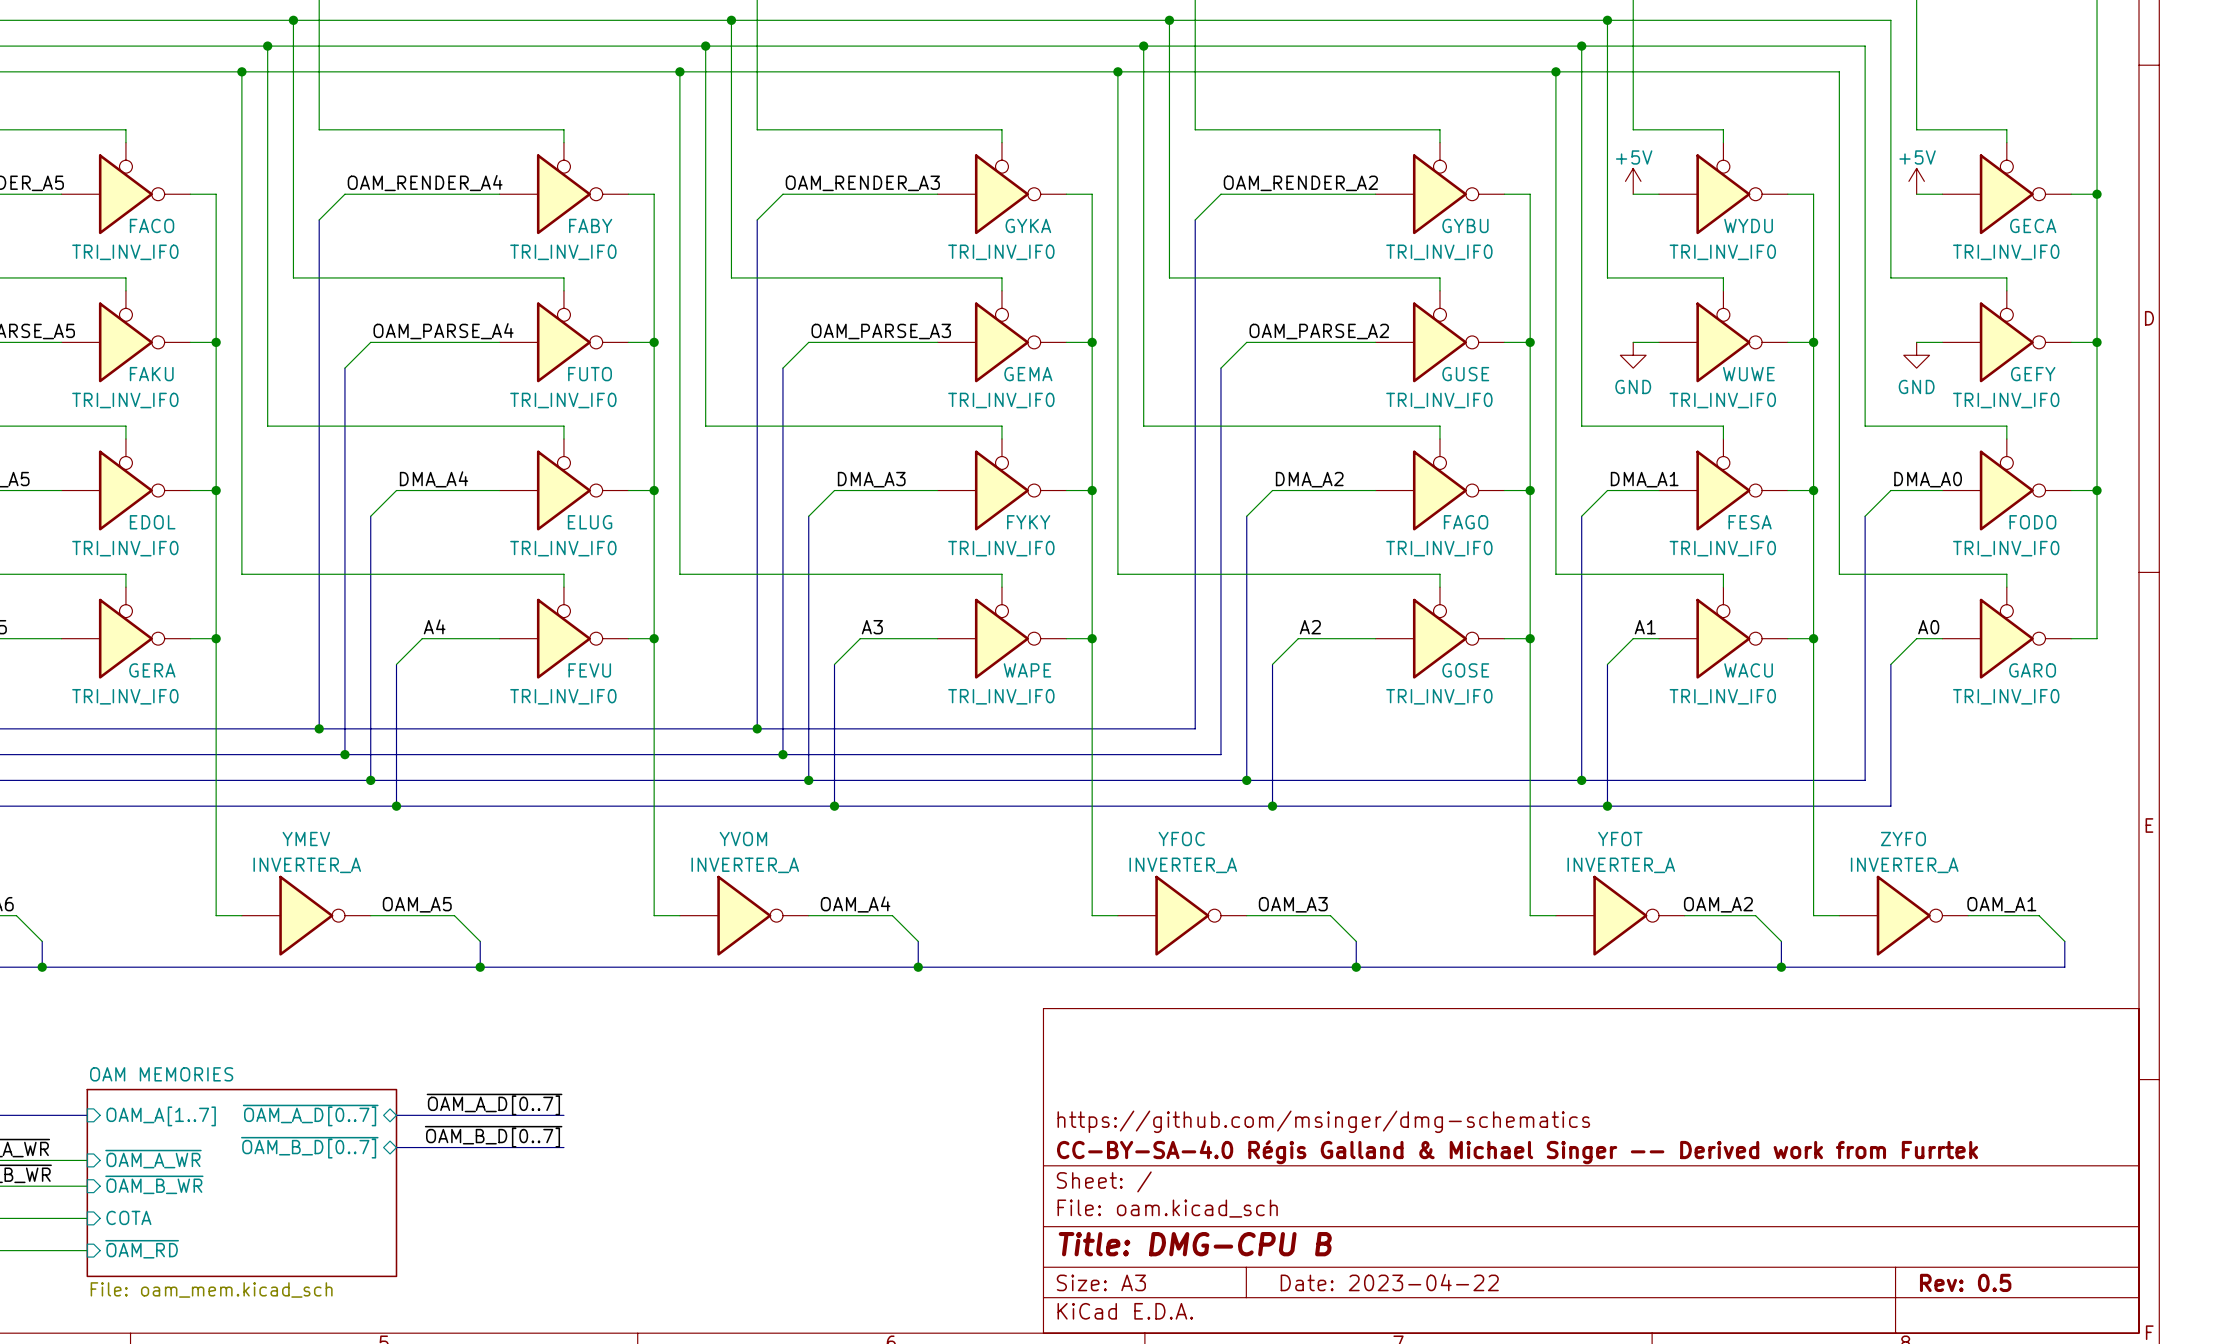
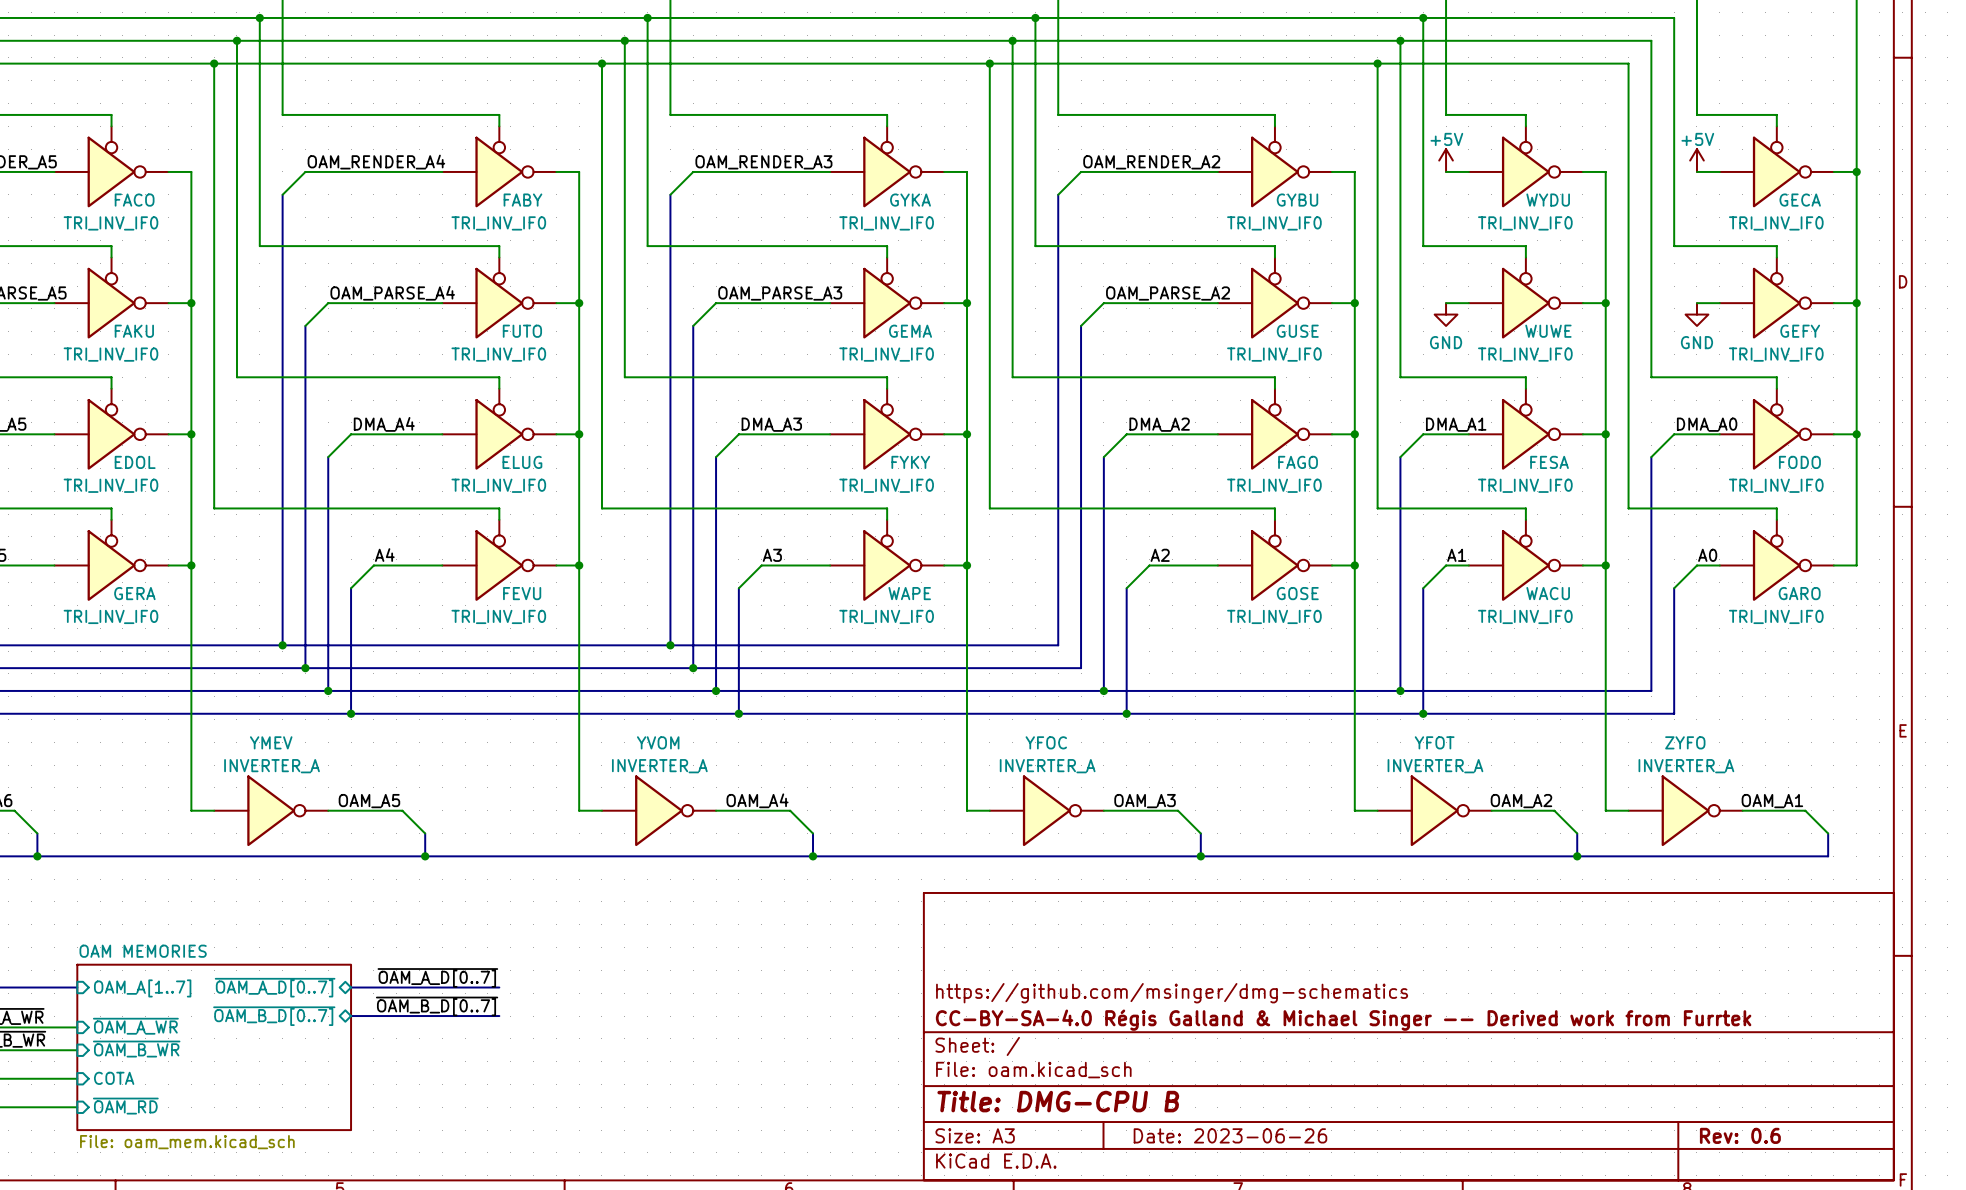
title block: Date: 2023-04-22 (1389, 1282) -> Date: 2023-06-26 (1230, 1135)
title block: Rev: 0.5 (1965, 1282) -> Rev: 0.6 (1740, 1135)

